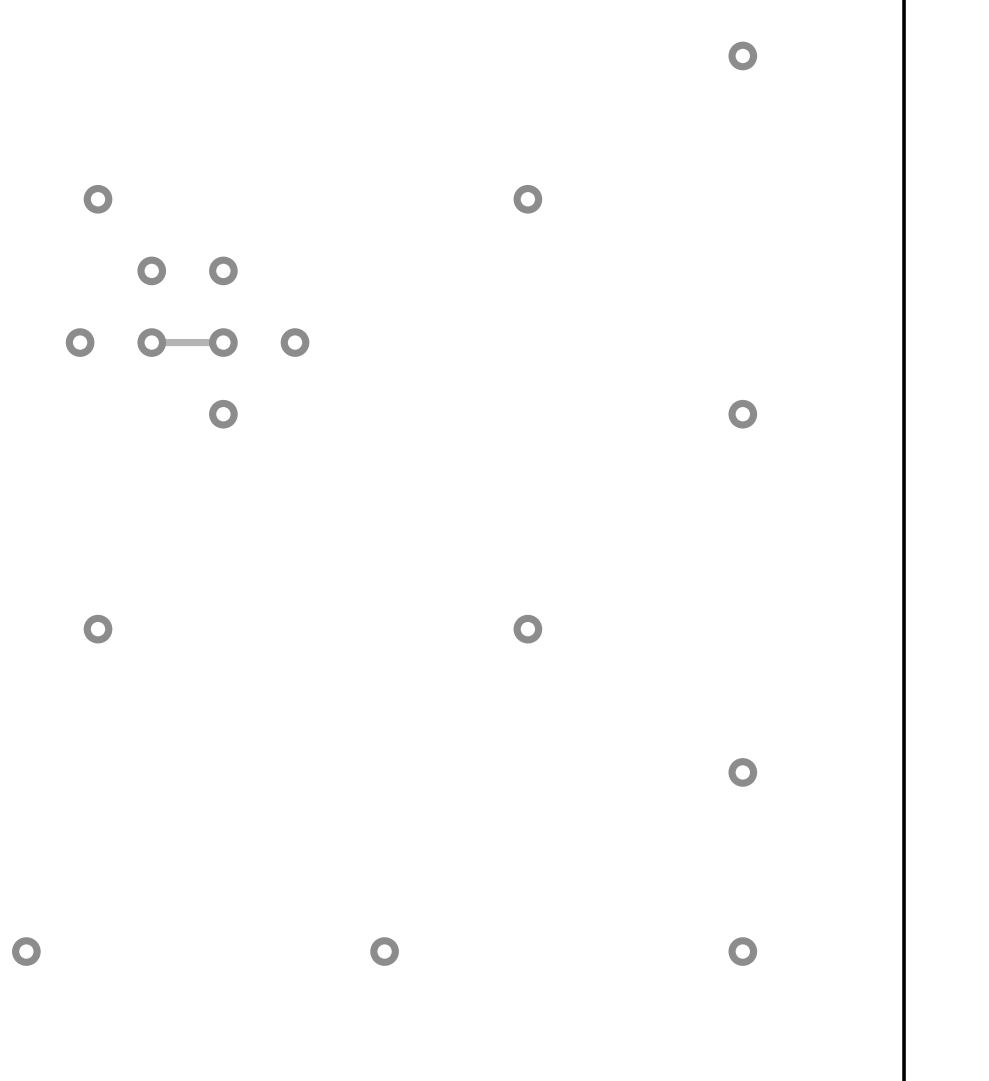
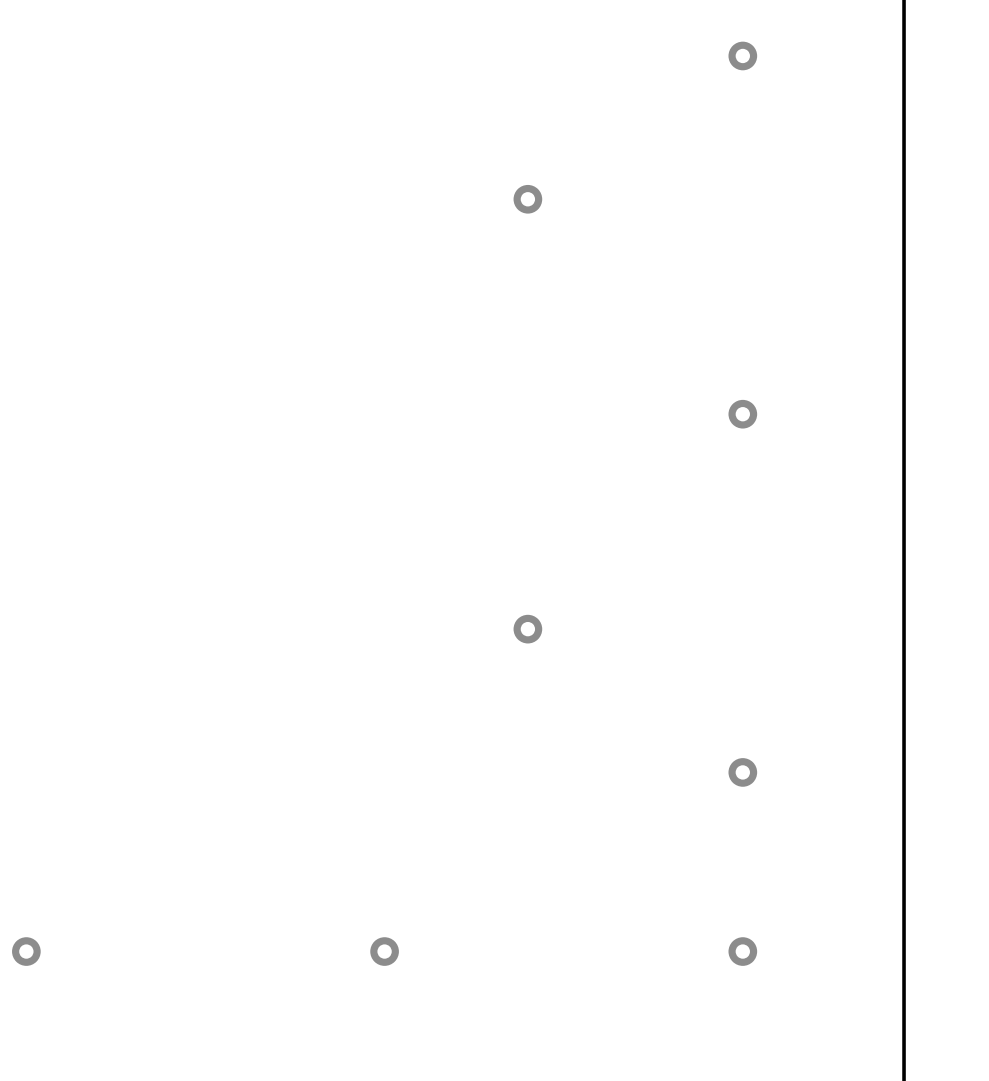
via: (98, 199) -> none
via: (151, 270) -> none
via: (223, 270) -> none
via: (80, 342) -> none
via: (151, 342) -> none
track: (223, 342) (151, 342) -> none
via: (223, 342) -> none
via: (295, 342) -> none
via: (223, 414) -> none
via: (98, 629) -> none

